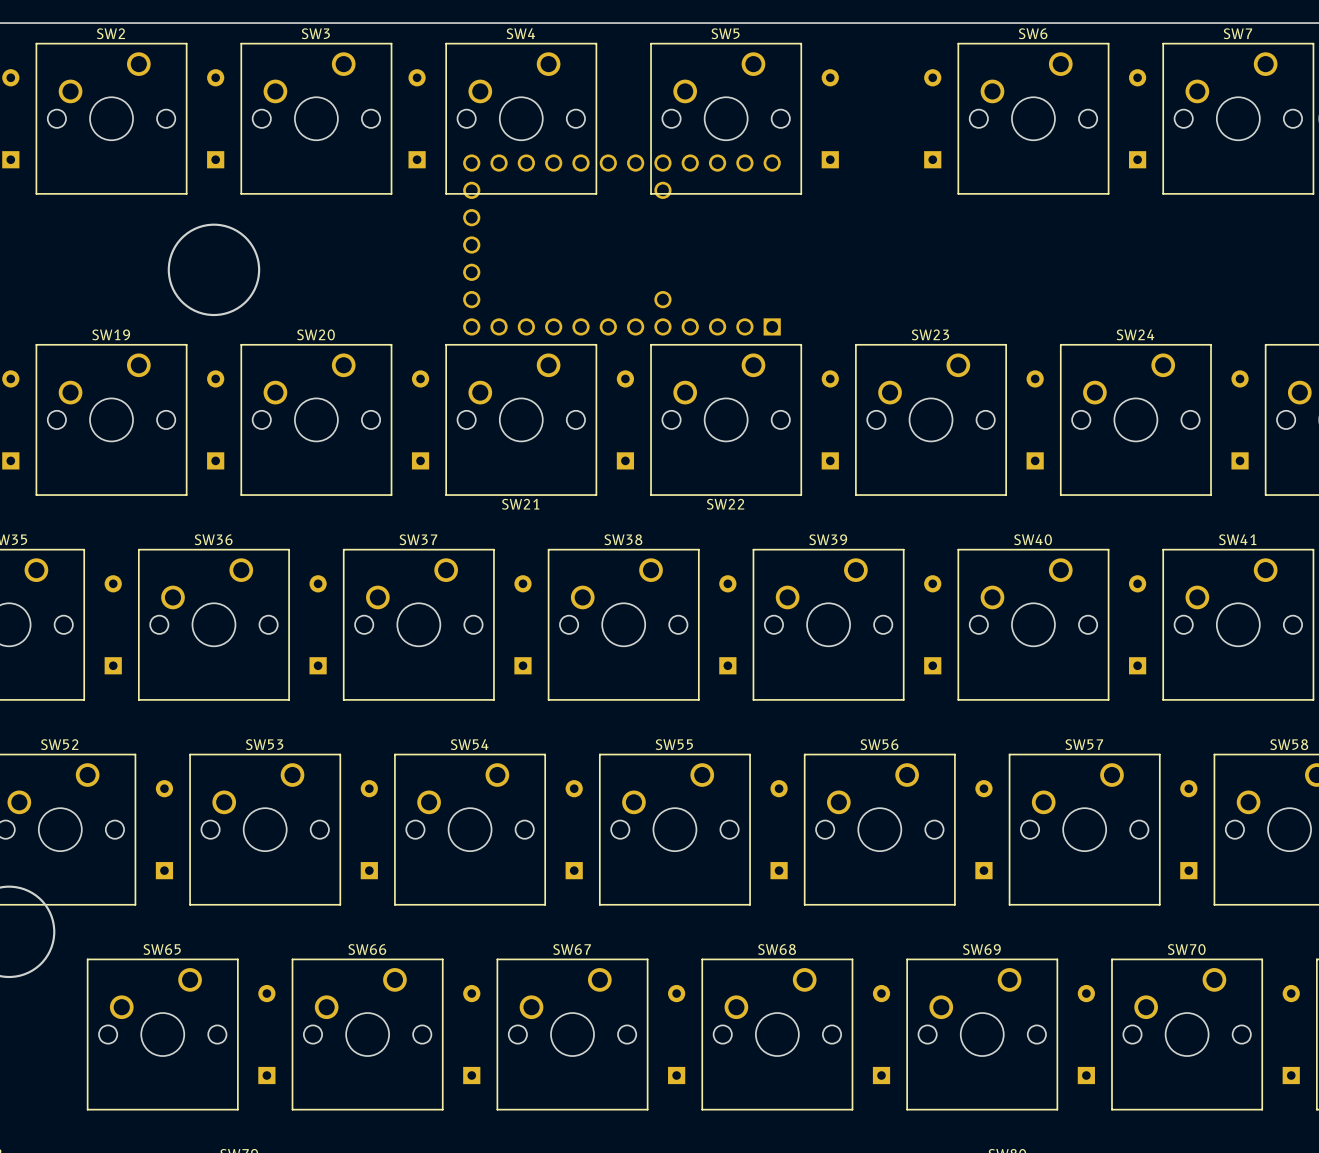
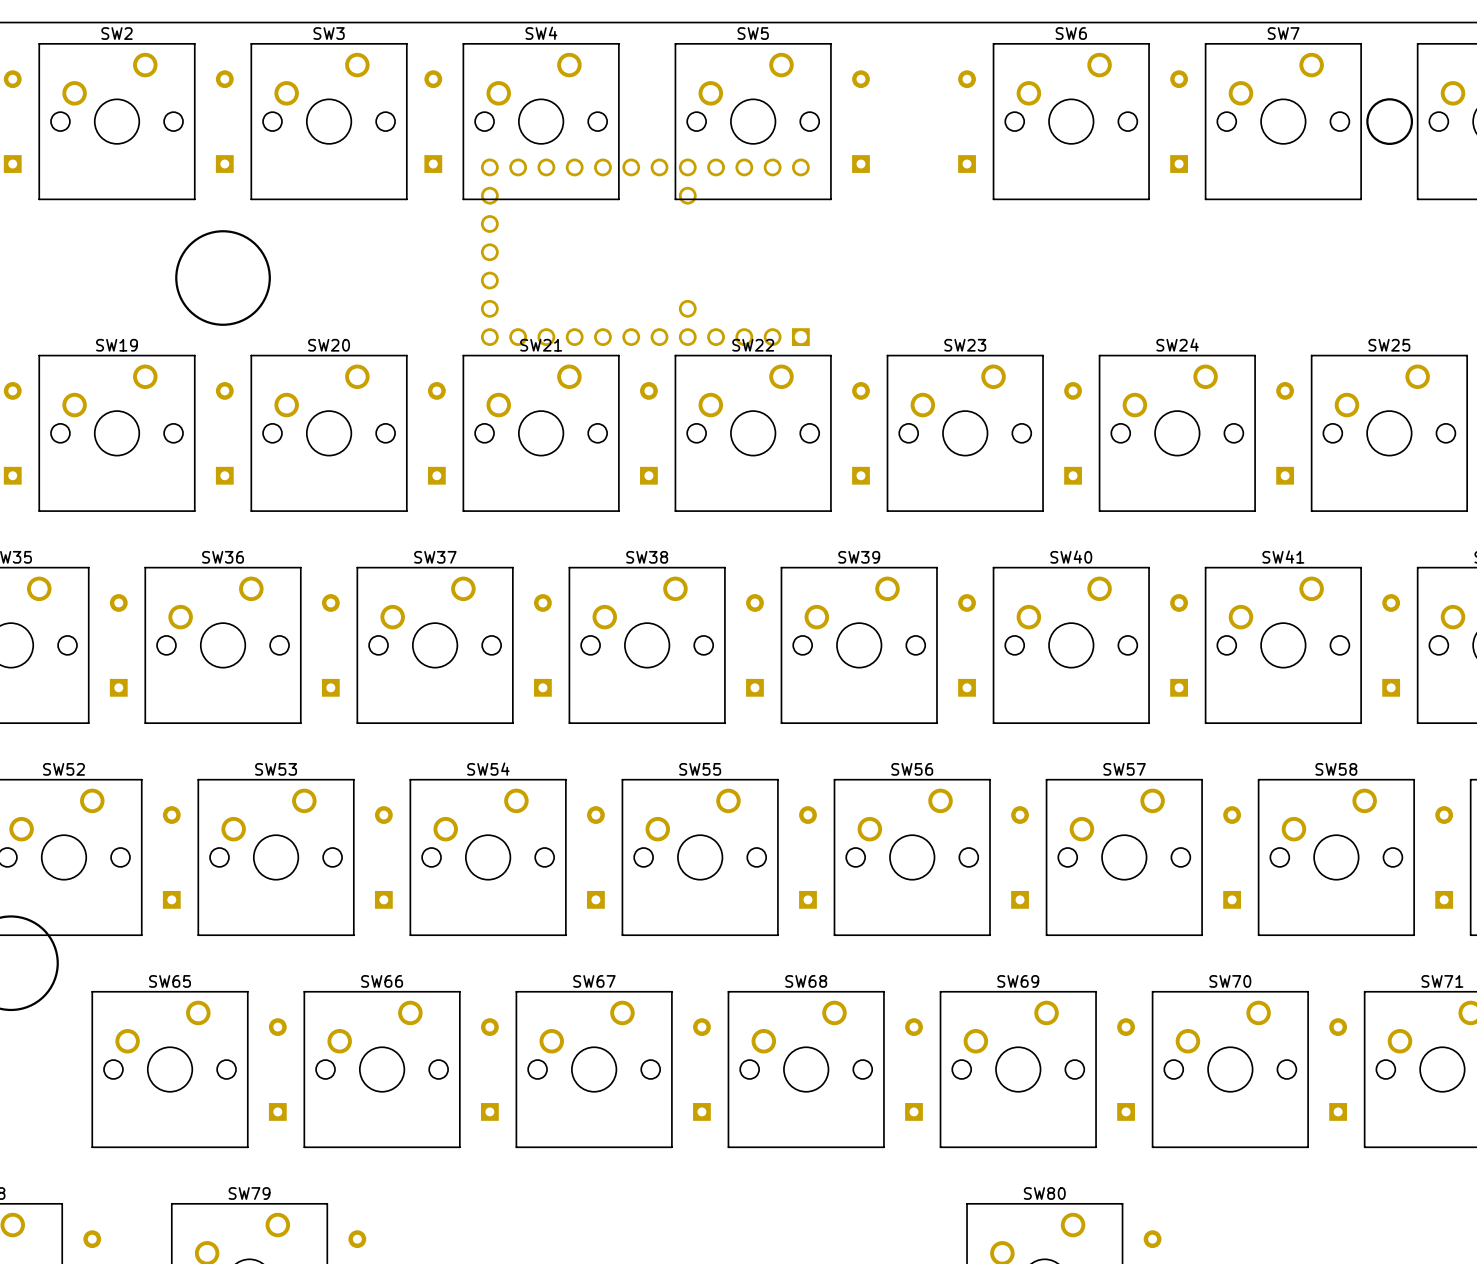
SW21 name position: SW21 (520, 504) -> SW21 (541, 345)
SW22 name position: SW22 (725, 504) -> SW22 (753, 345)

